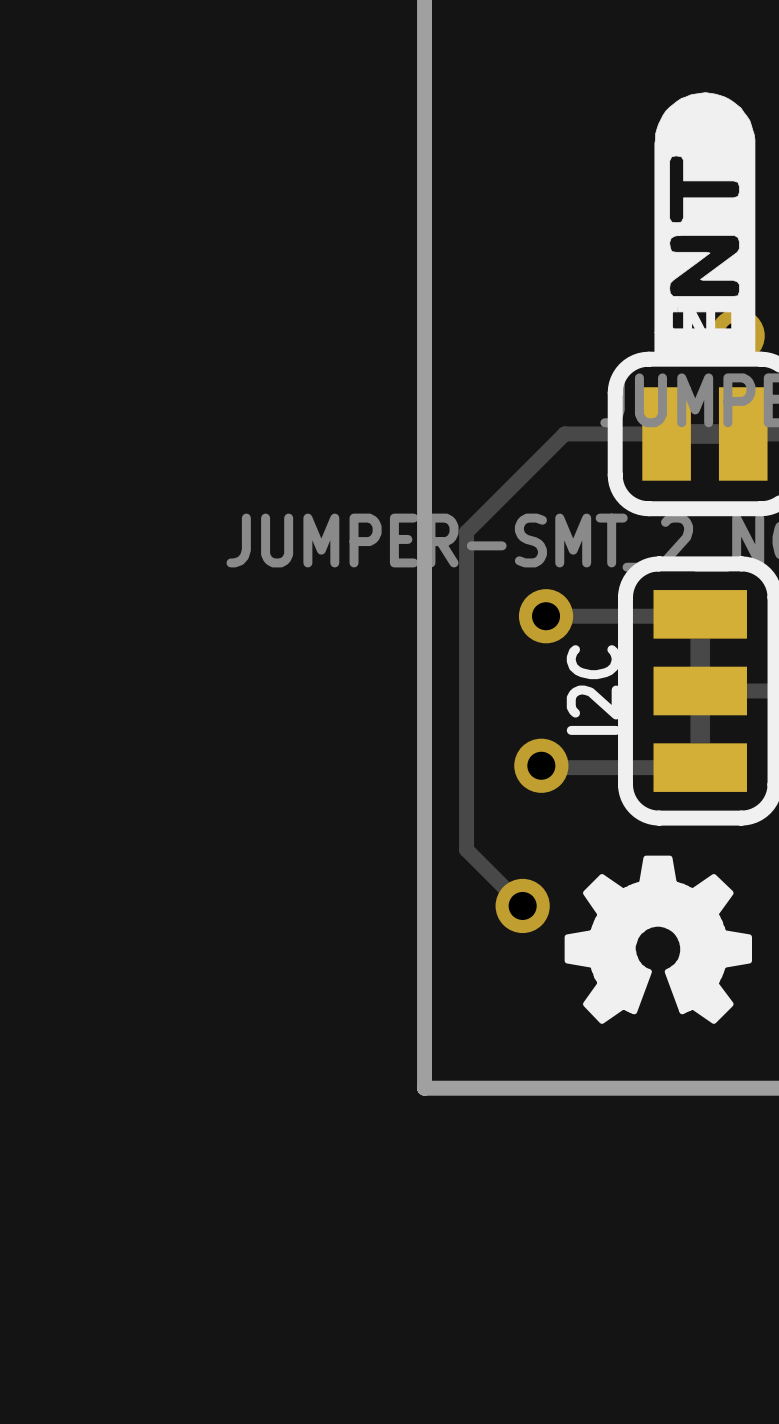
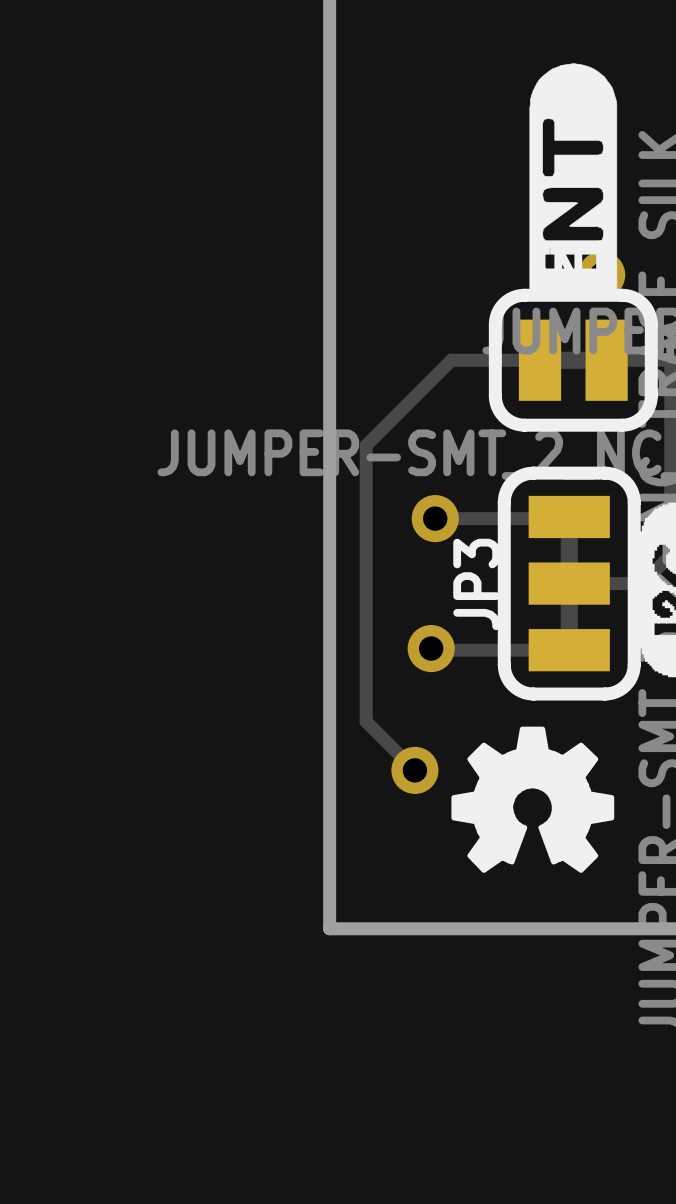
I2C name: I2C (593, 690) -> JP3 (476, 584)

